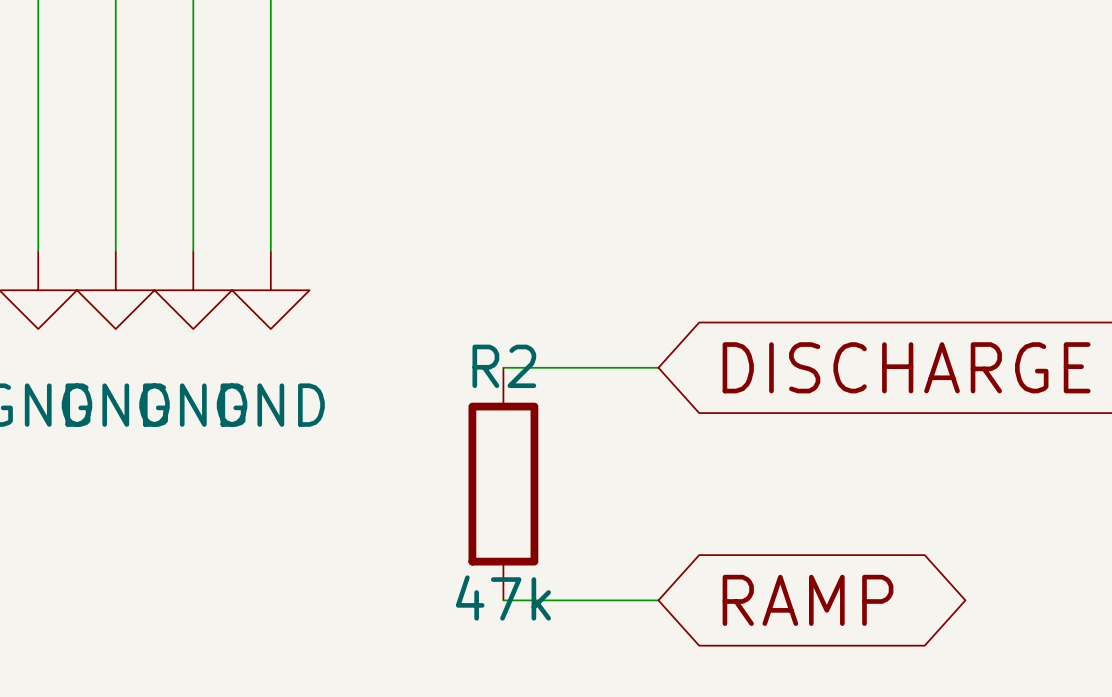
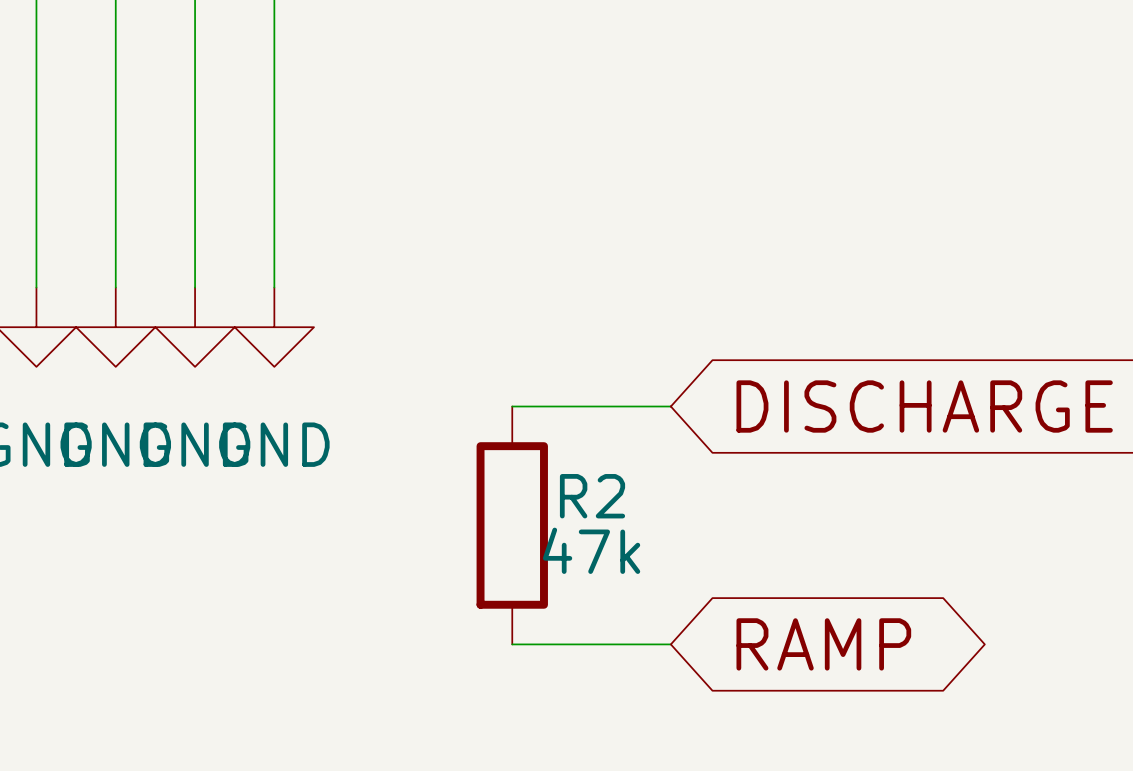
R2 name position: R2 (504, 366) -> R2 (592, 496)
R2 value position: 47k (503, 598) -> 47k (591, 550)

